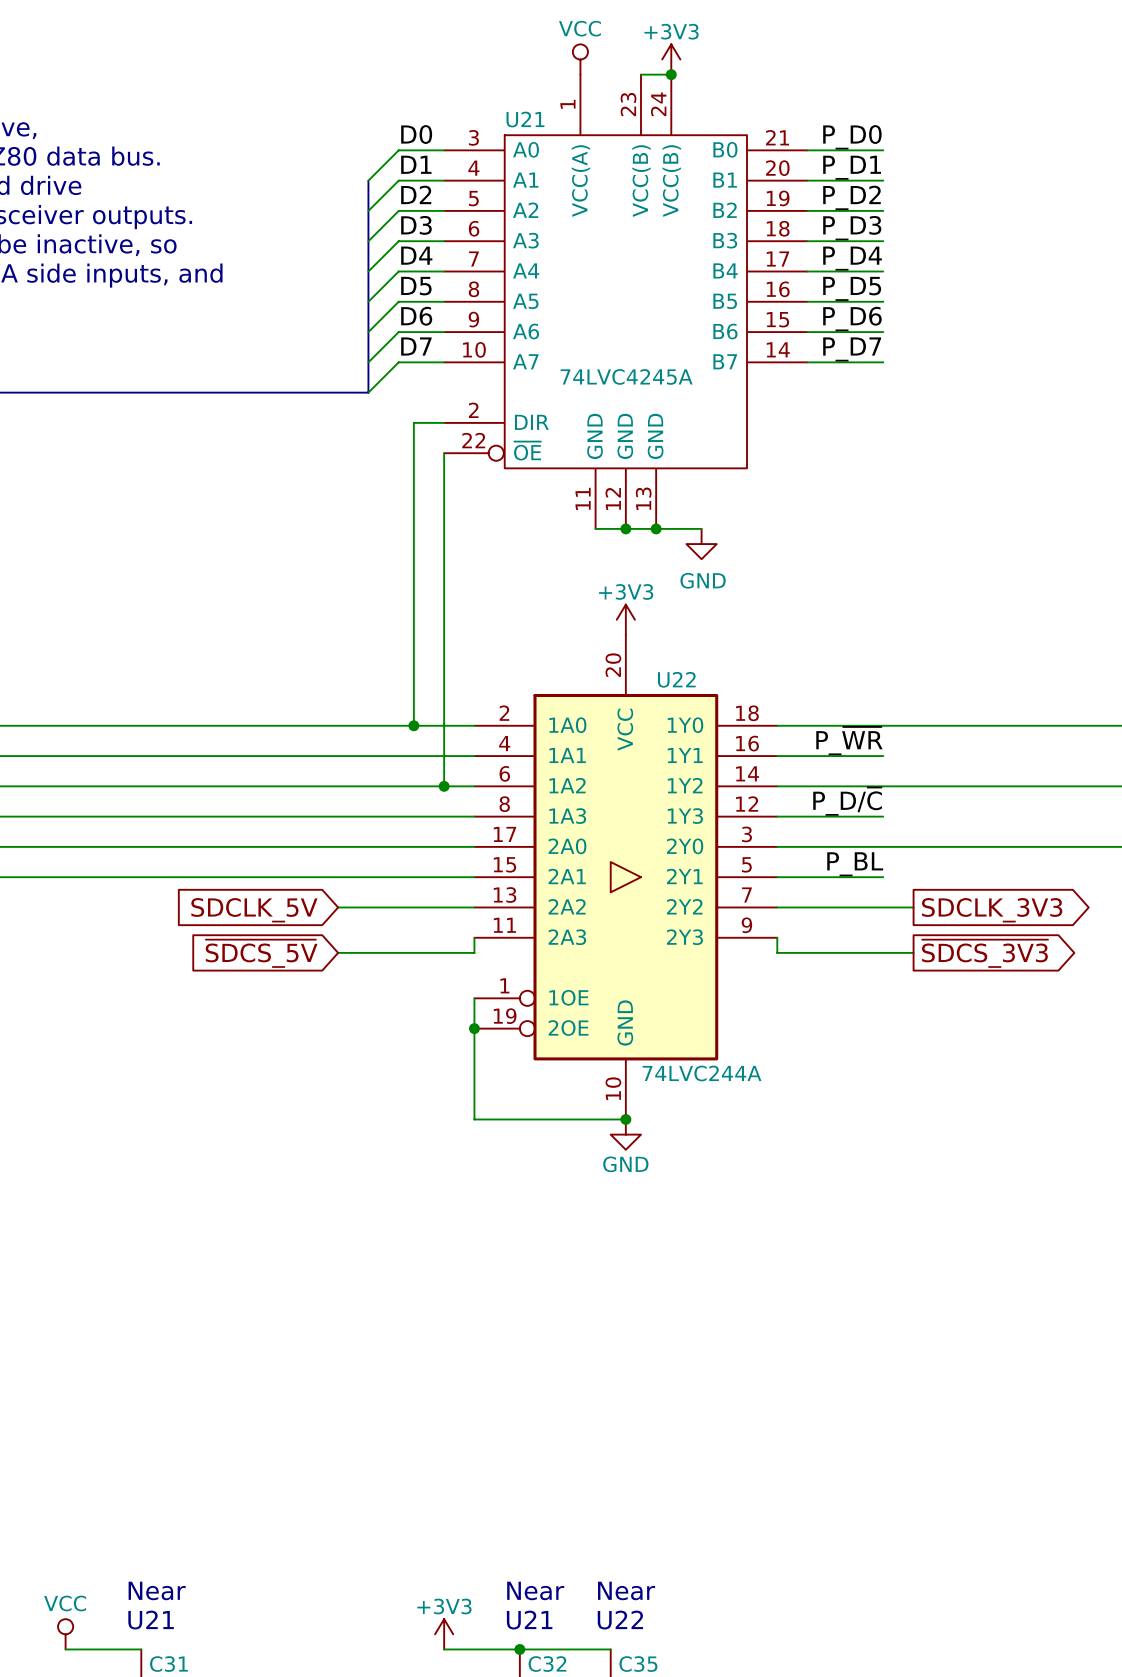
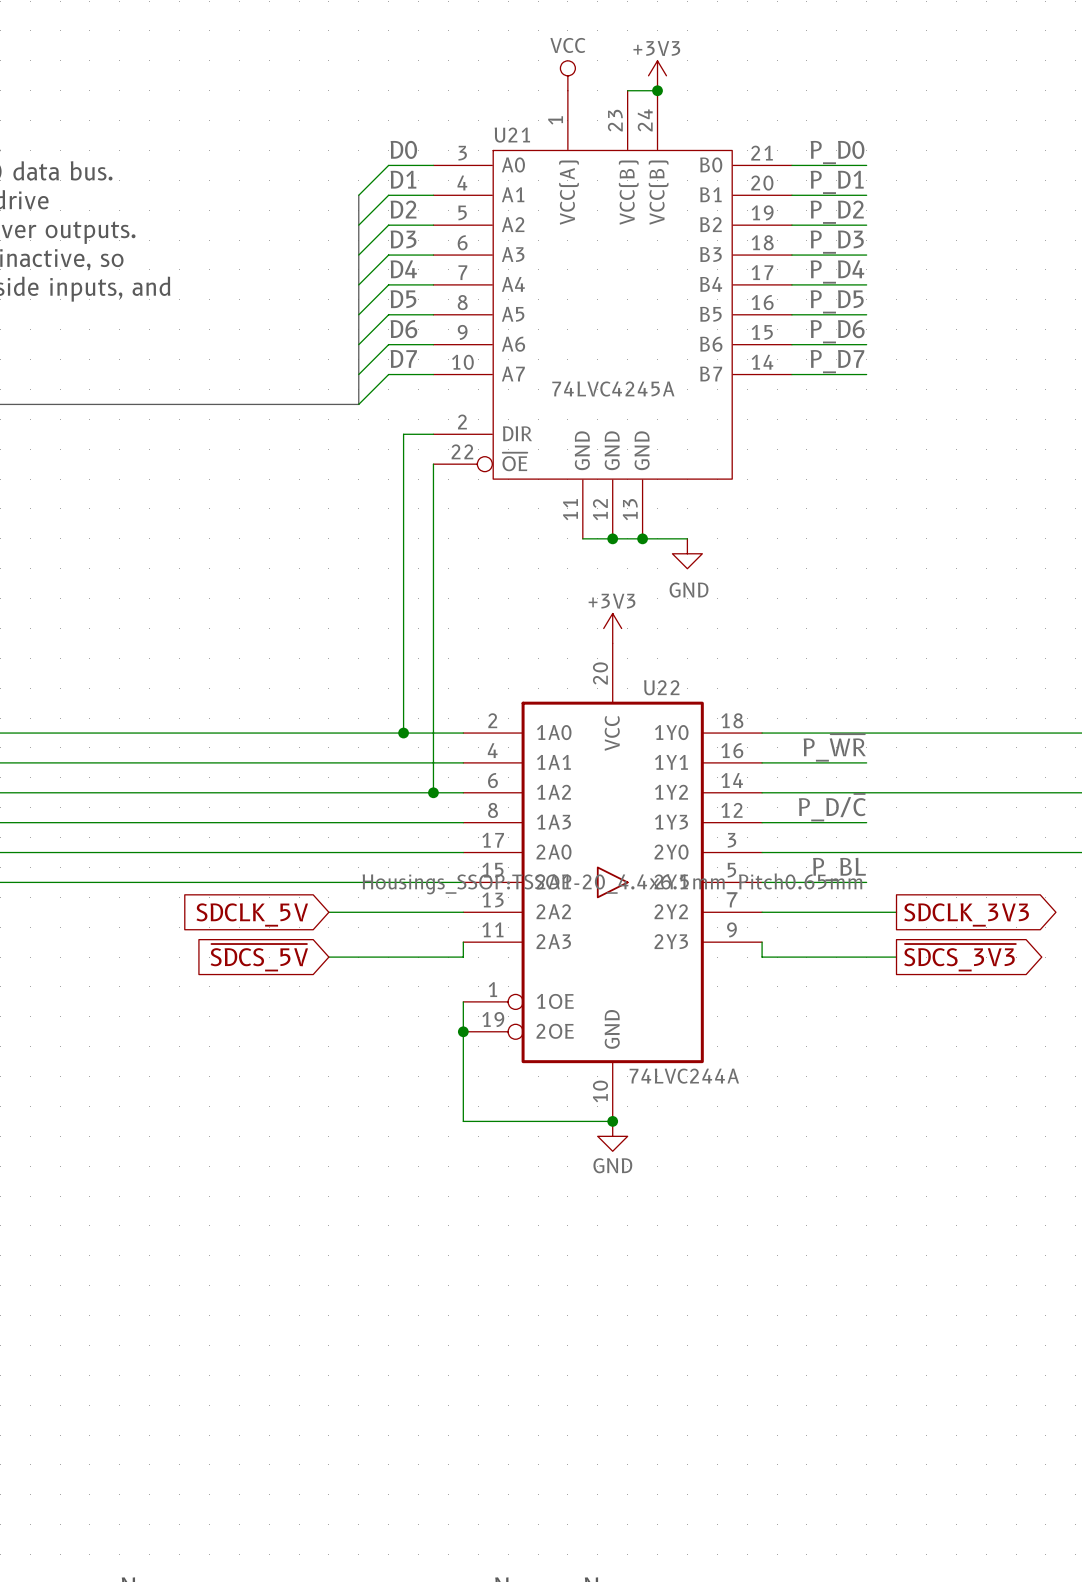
U22 text: none -> Housings_SSOP:TSSOP-20_4.4x6.5mm_Pitch0.65mm (612, 883)

